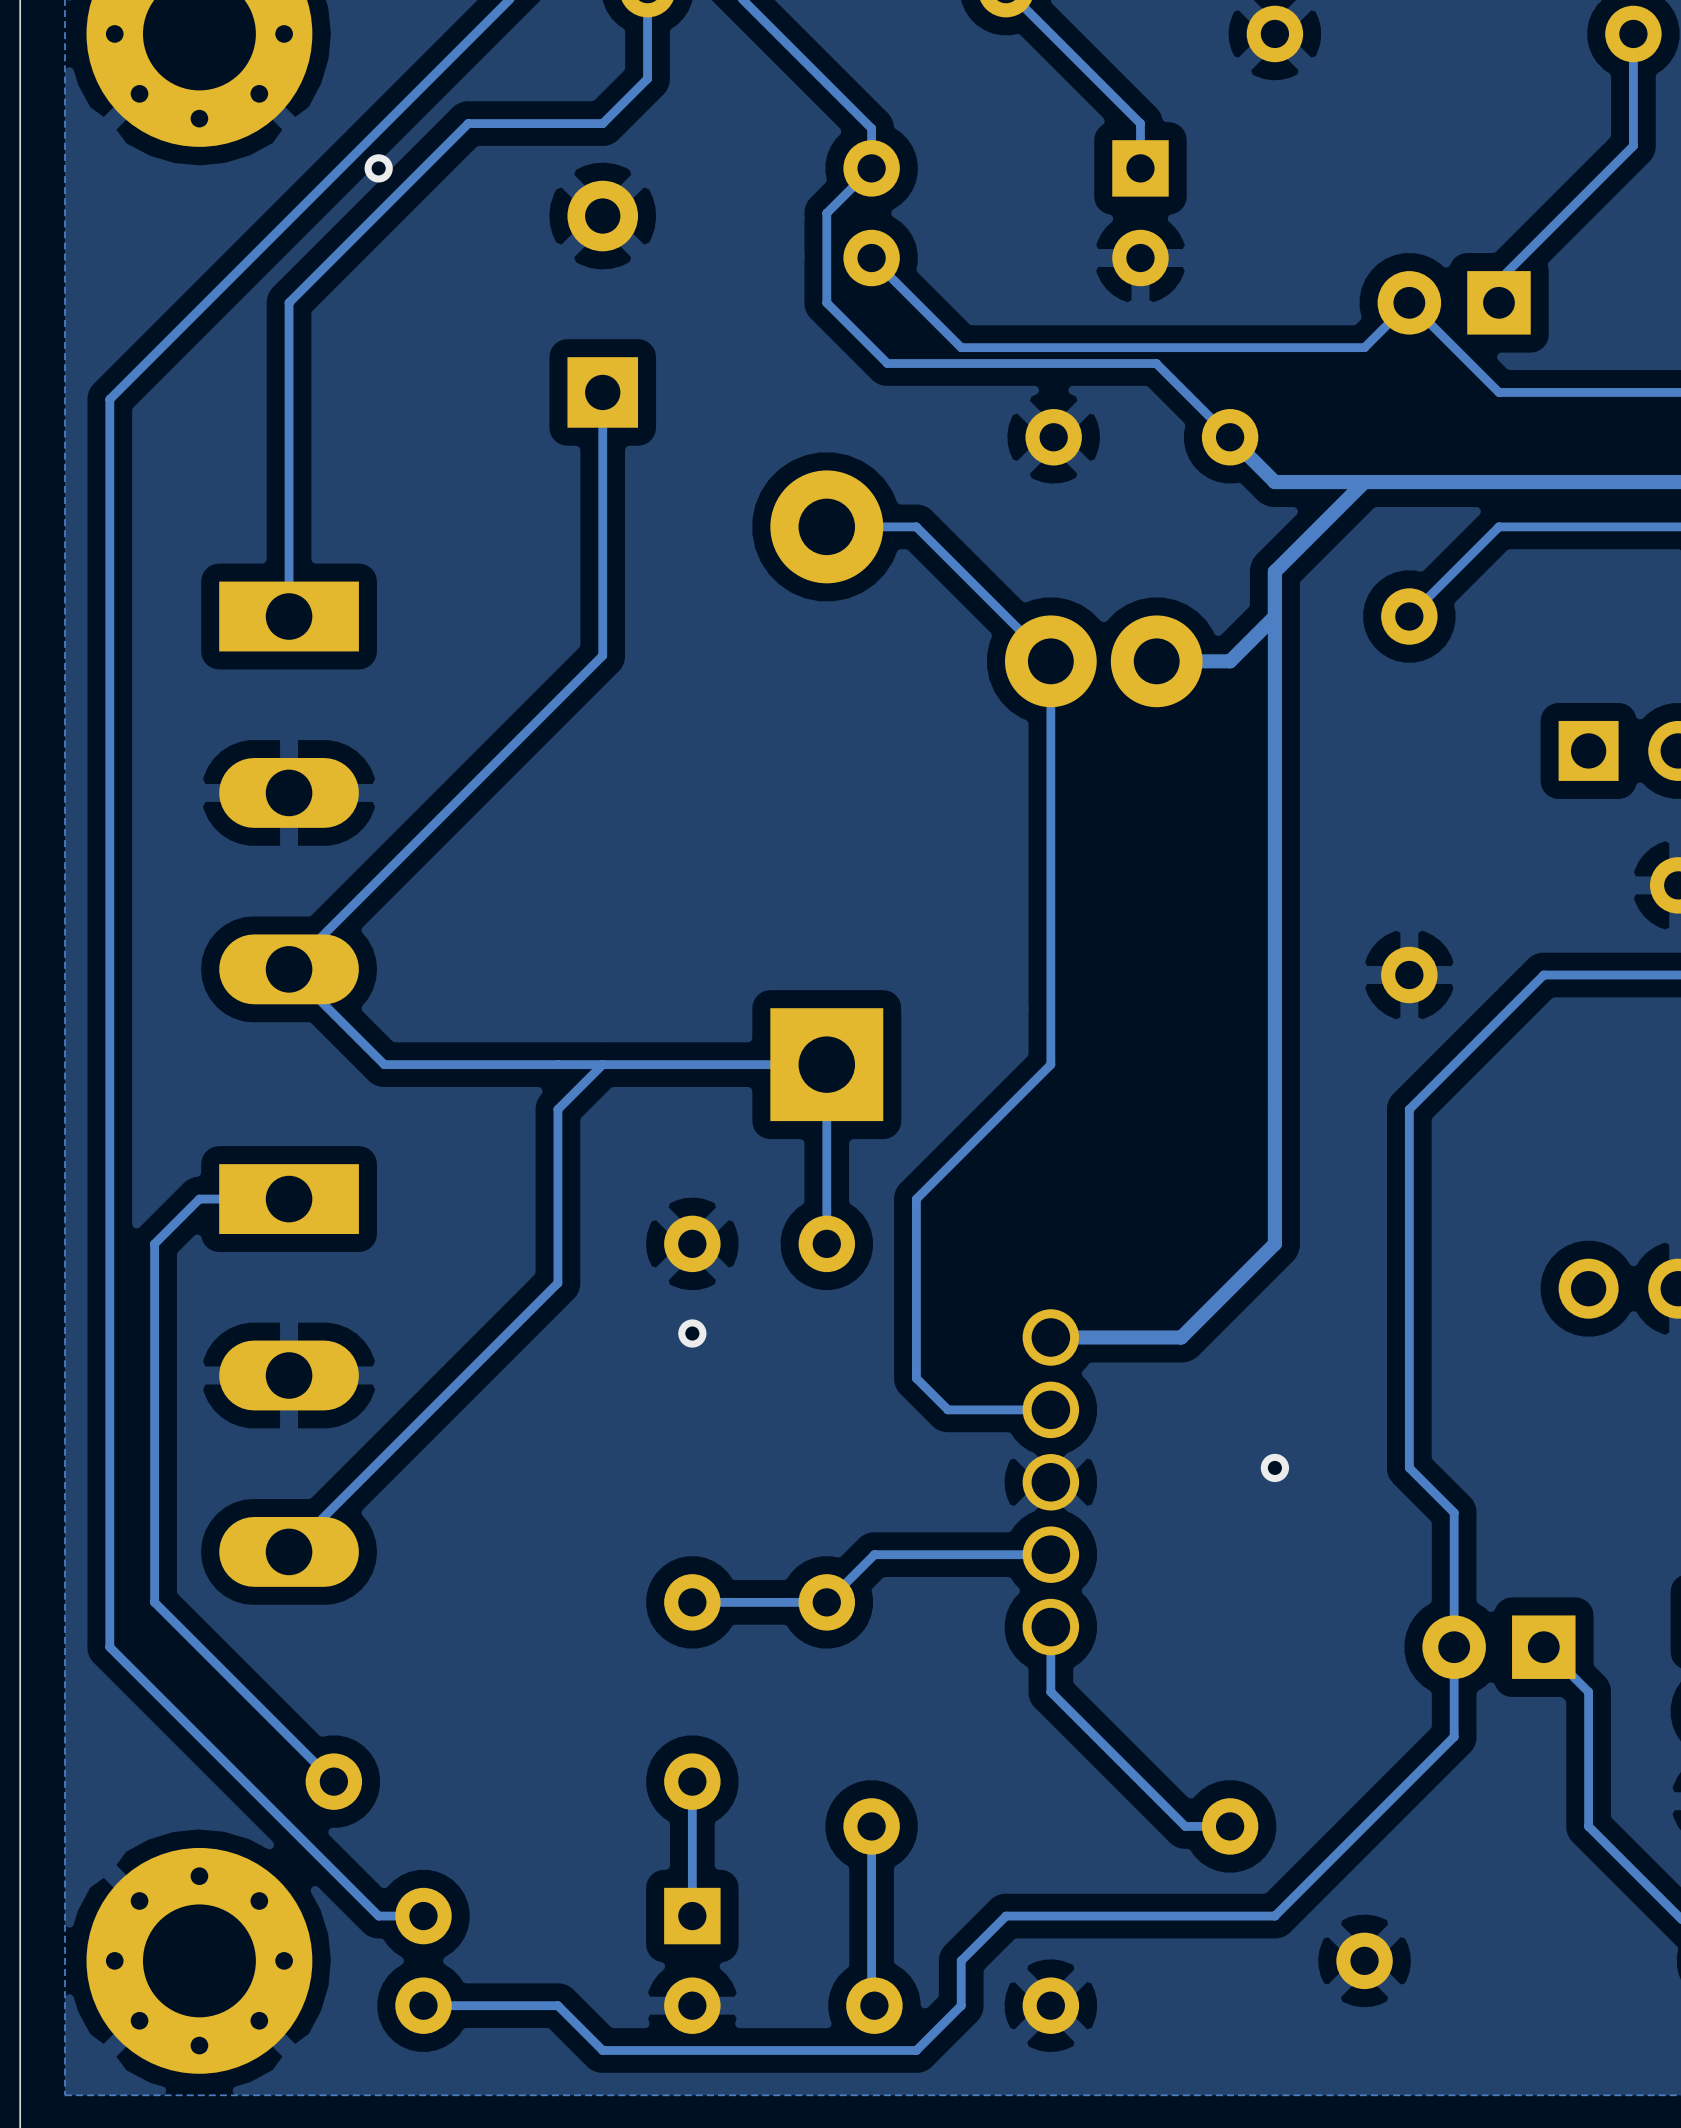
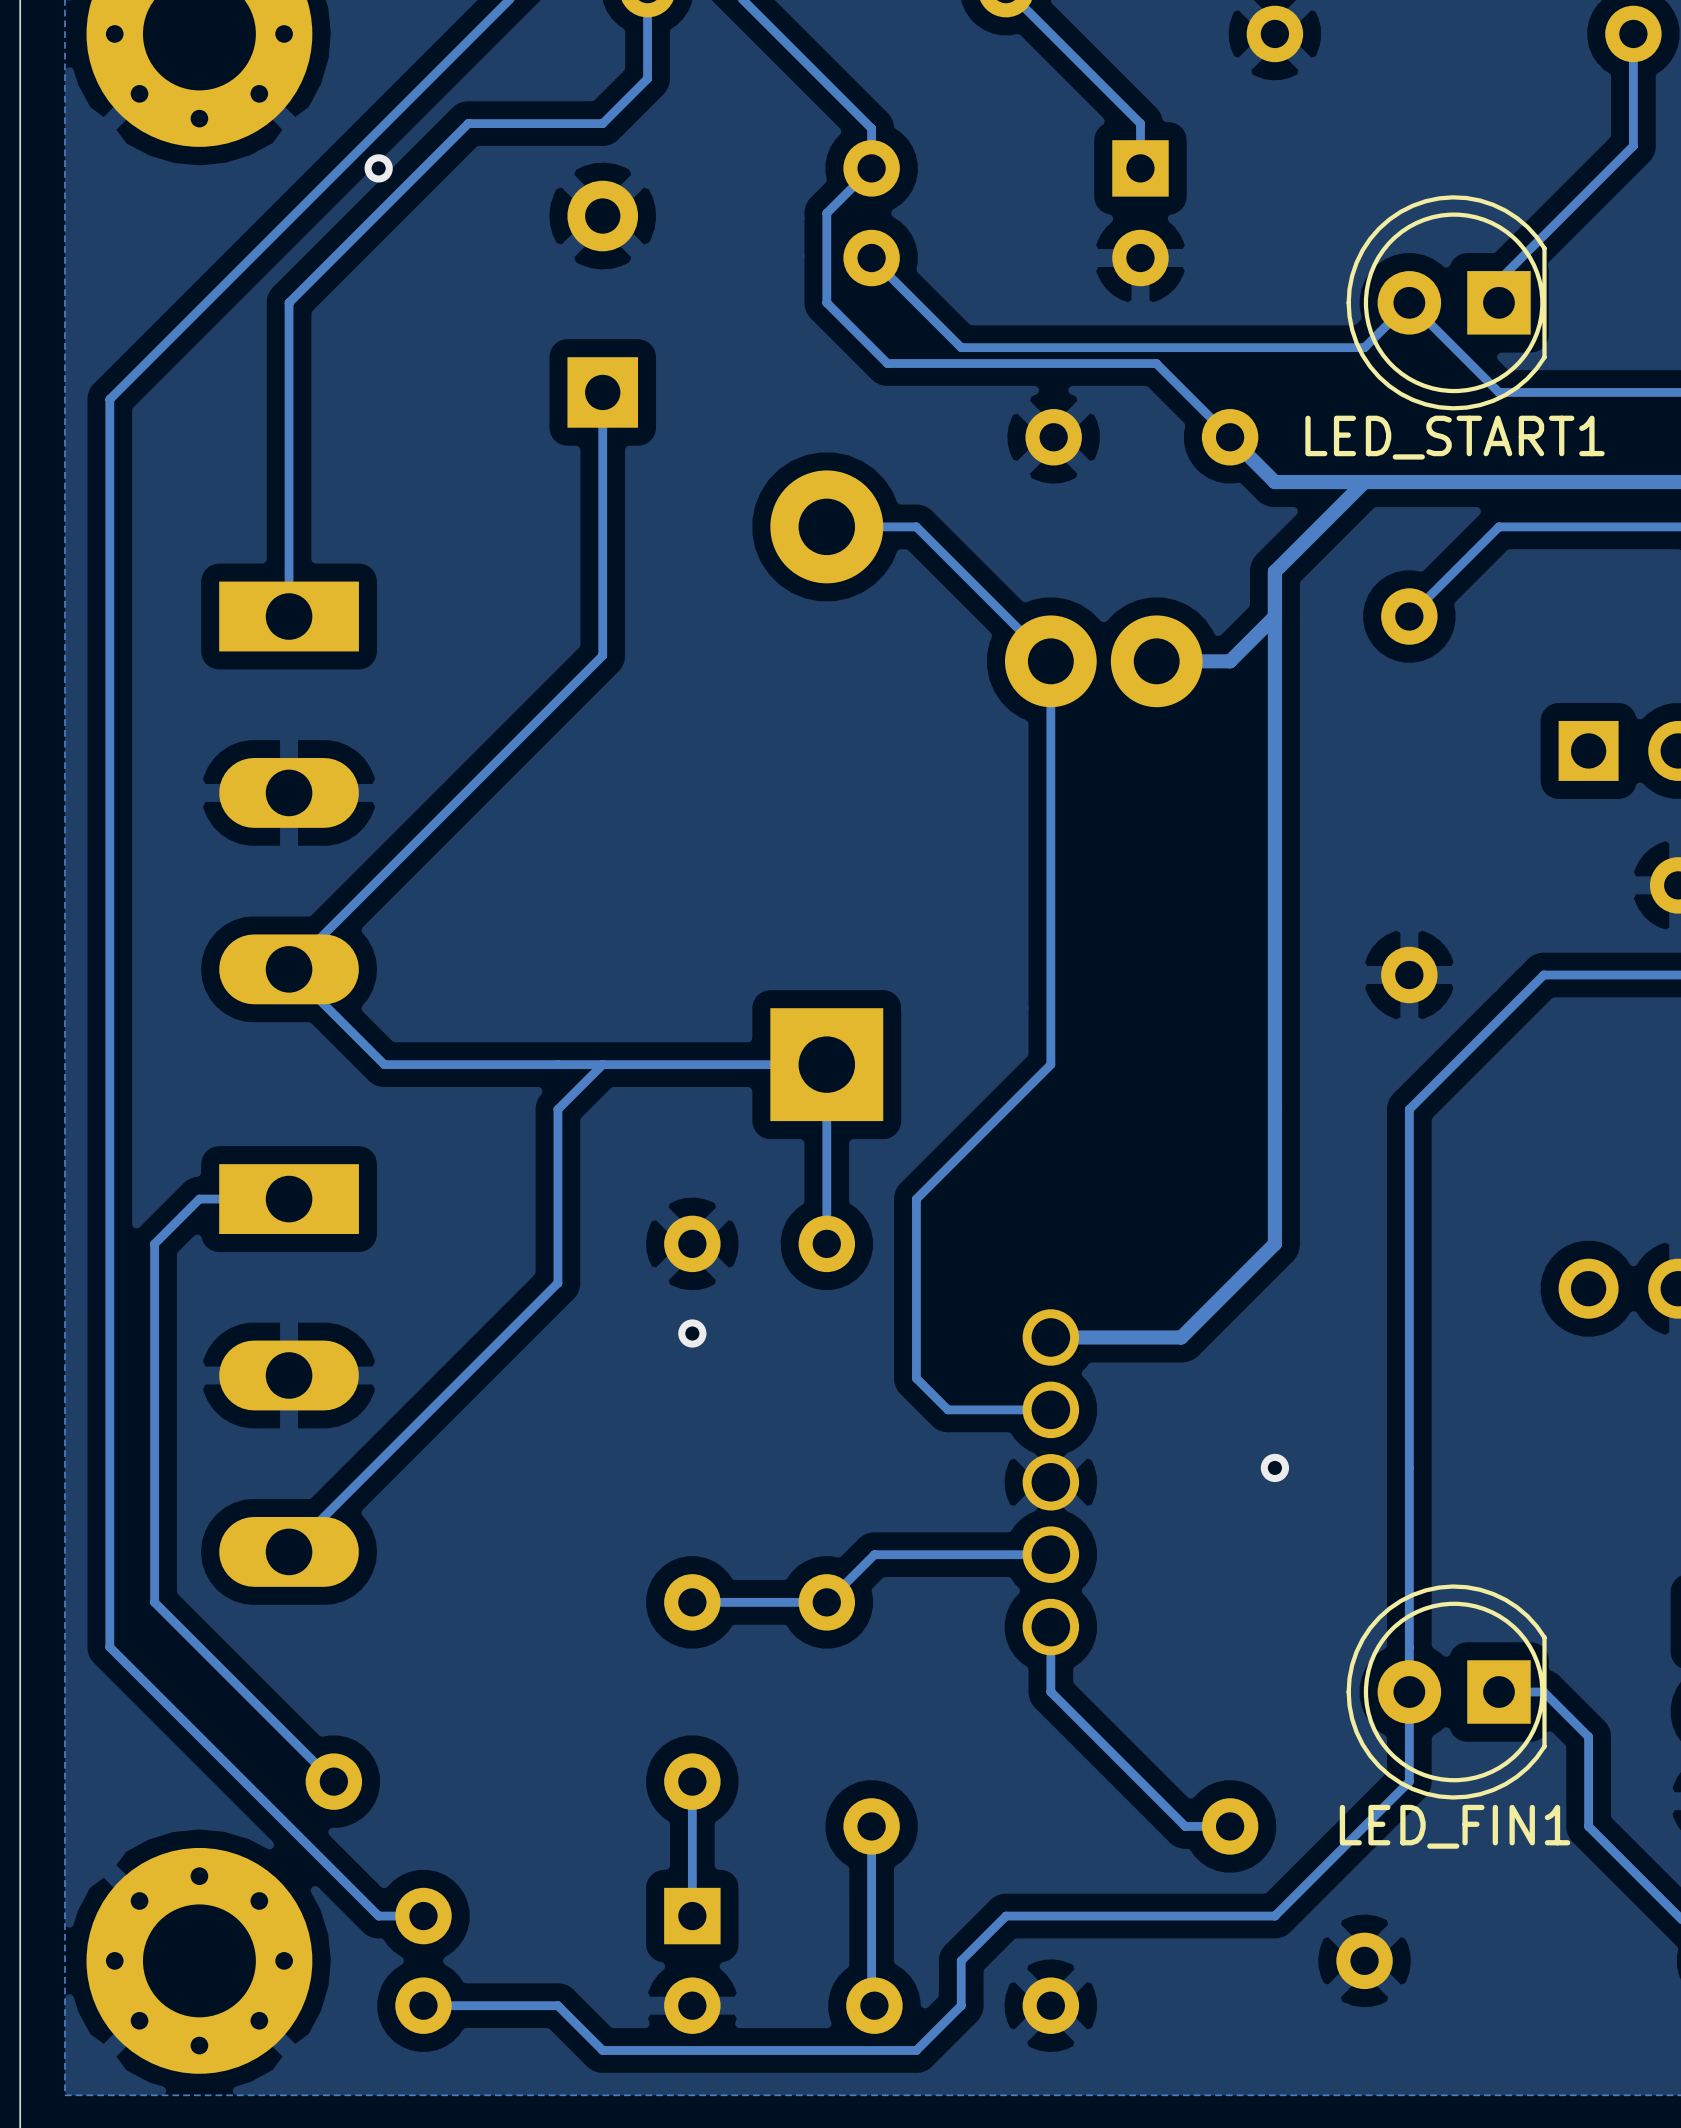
LED_START1 side: top (1454, 302) -> bottom (1446, 302)
track: (1409, 1467) (1454, 1512) (1454, 1736) (1409, 1781) -> (1409, 1467) (1409, 1781)
LED_FIN1 side: top (1498, 1647) -> bottom (1446, 1692)
track: (1543, 1647) (1588, 1692) (1588, 1736) -> (1498, 1692) (1543, 1692) (1588, 1736)

